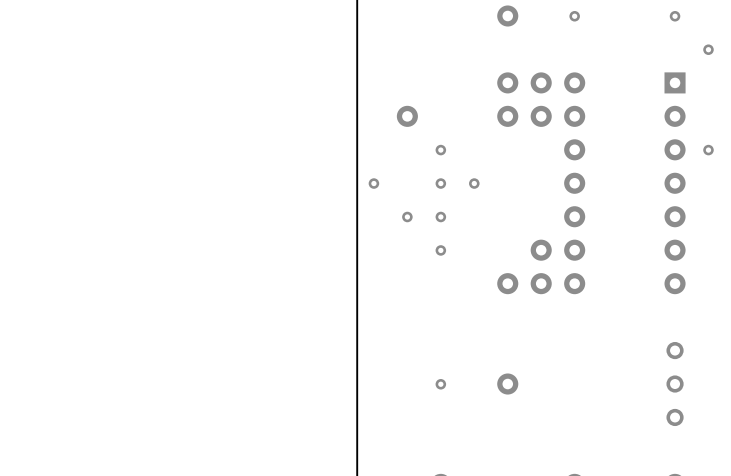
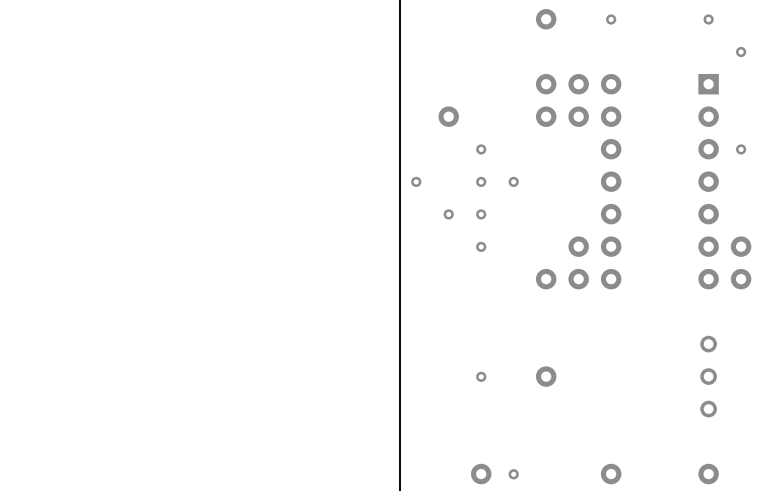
part: none -> (741, 262)

